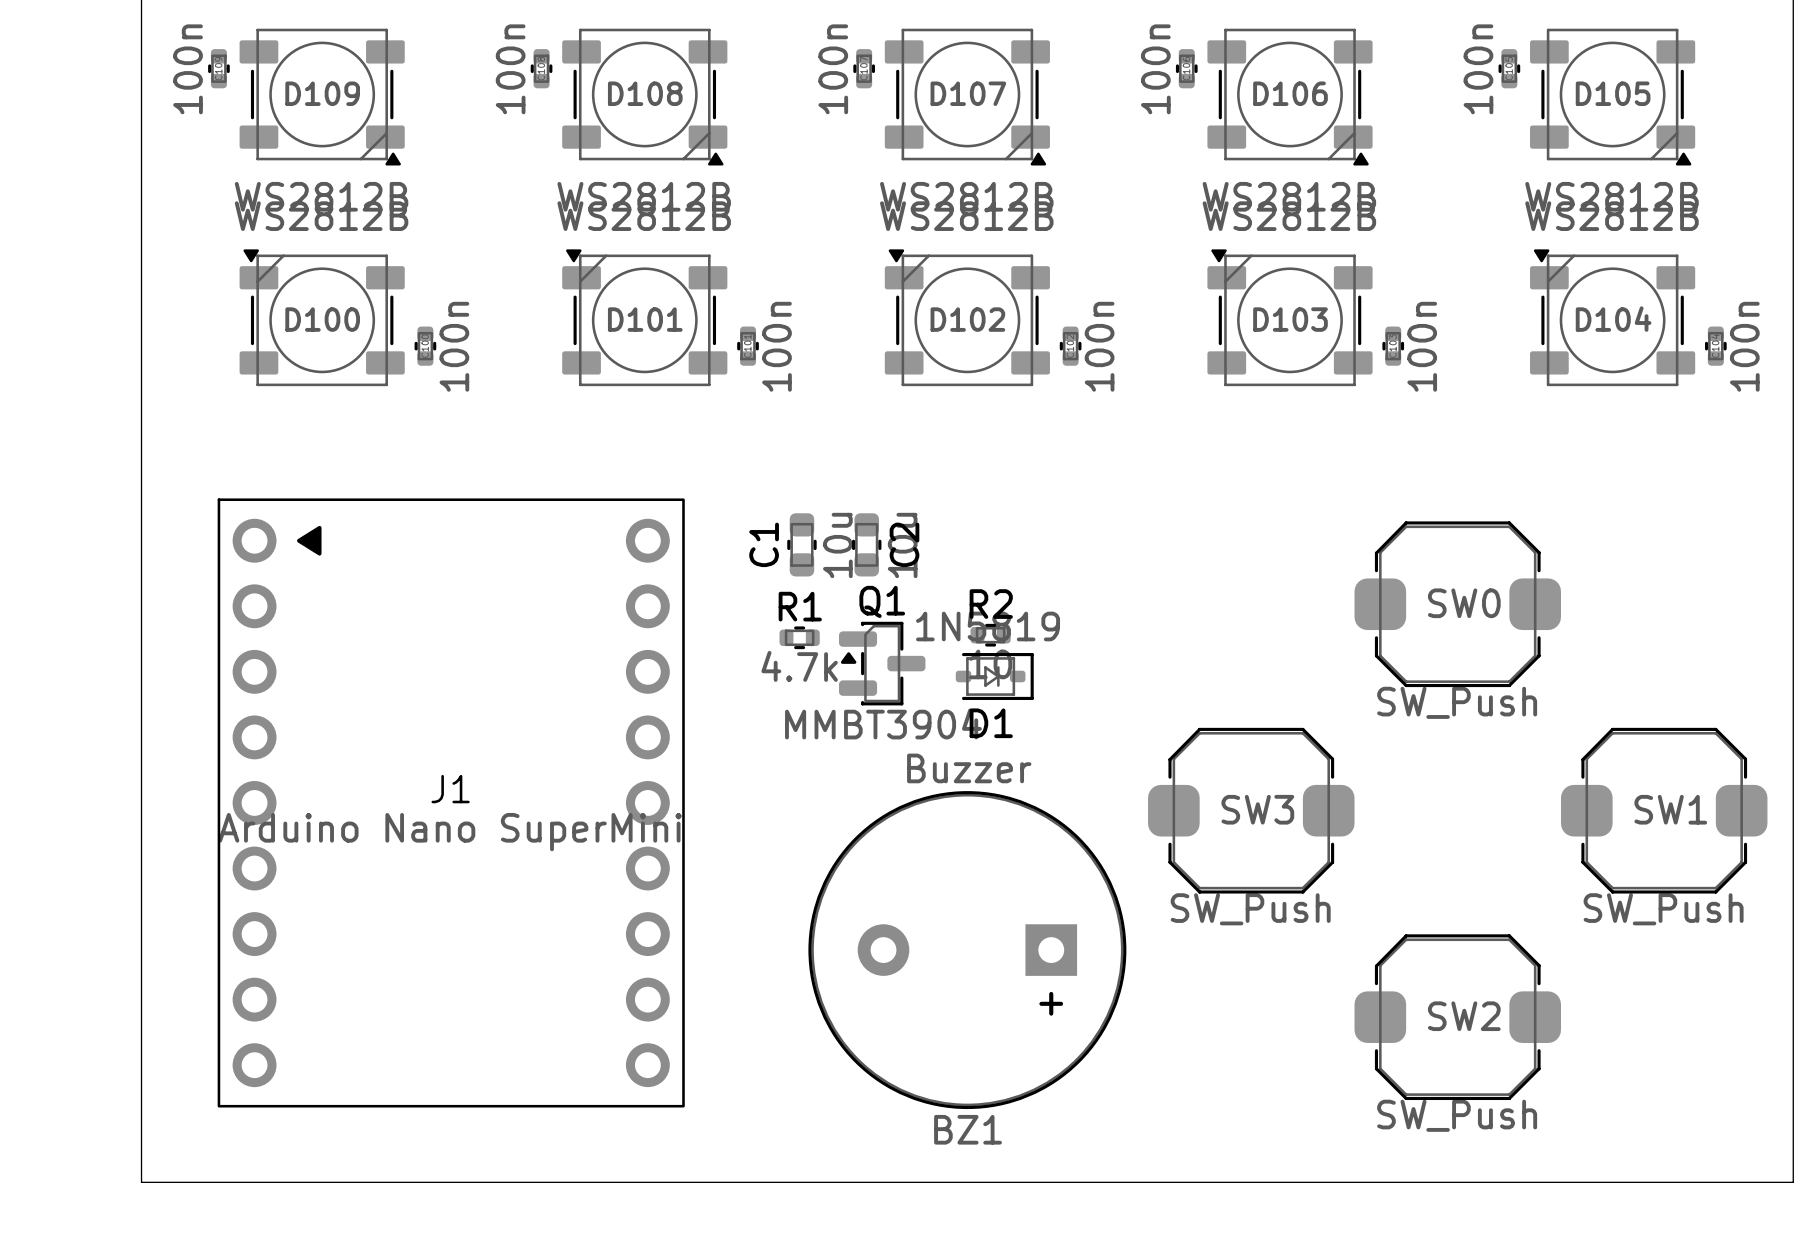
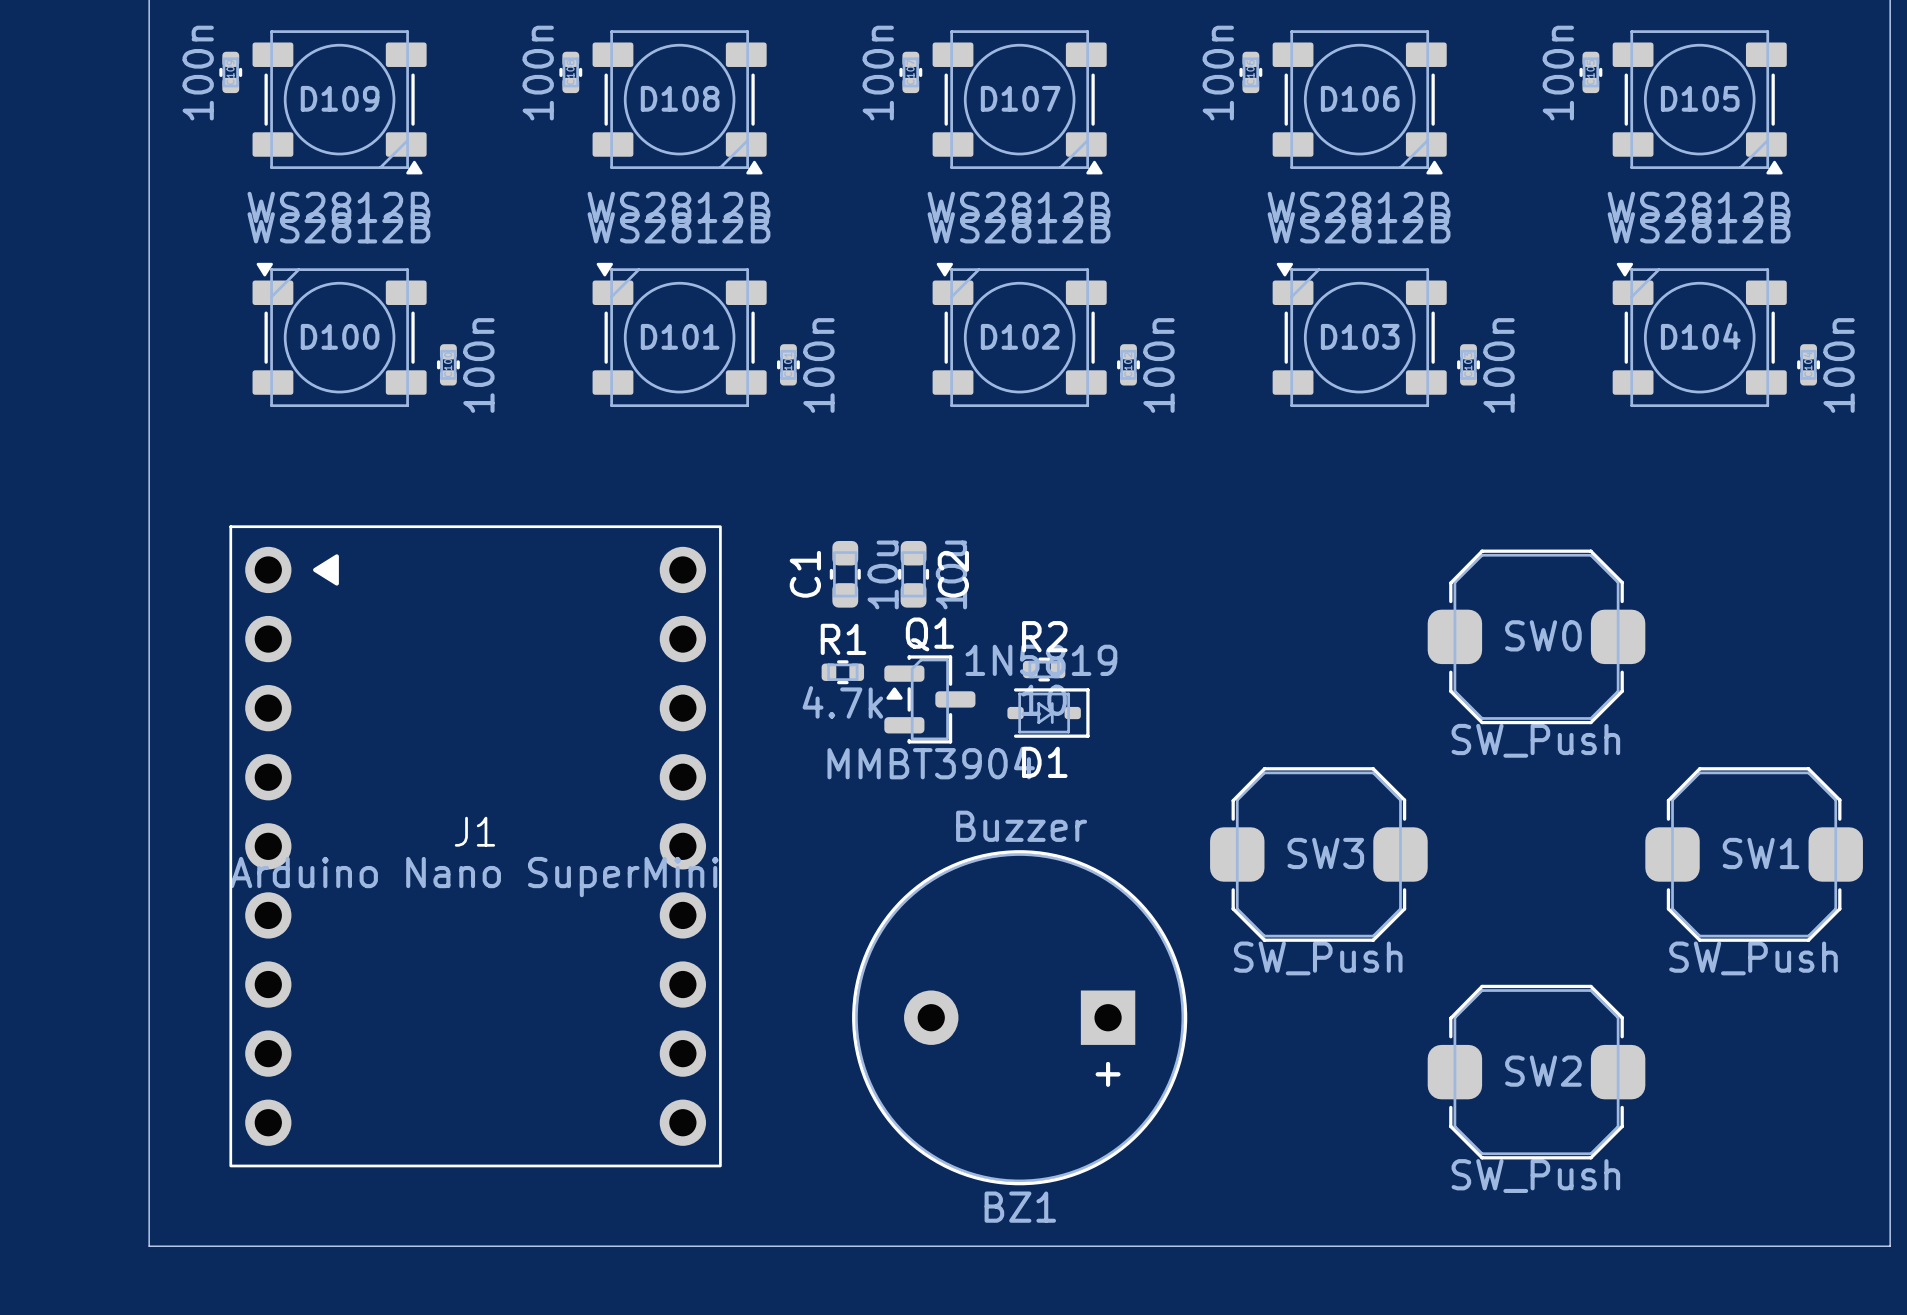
BZ1 position: (967, 950) -> (1019, 1017)

